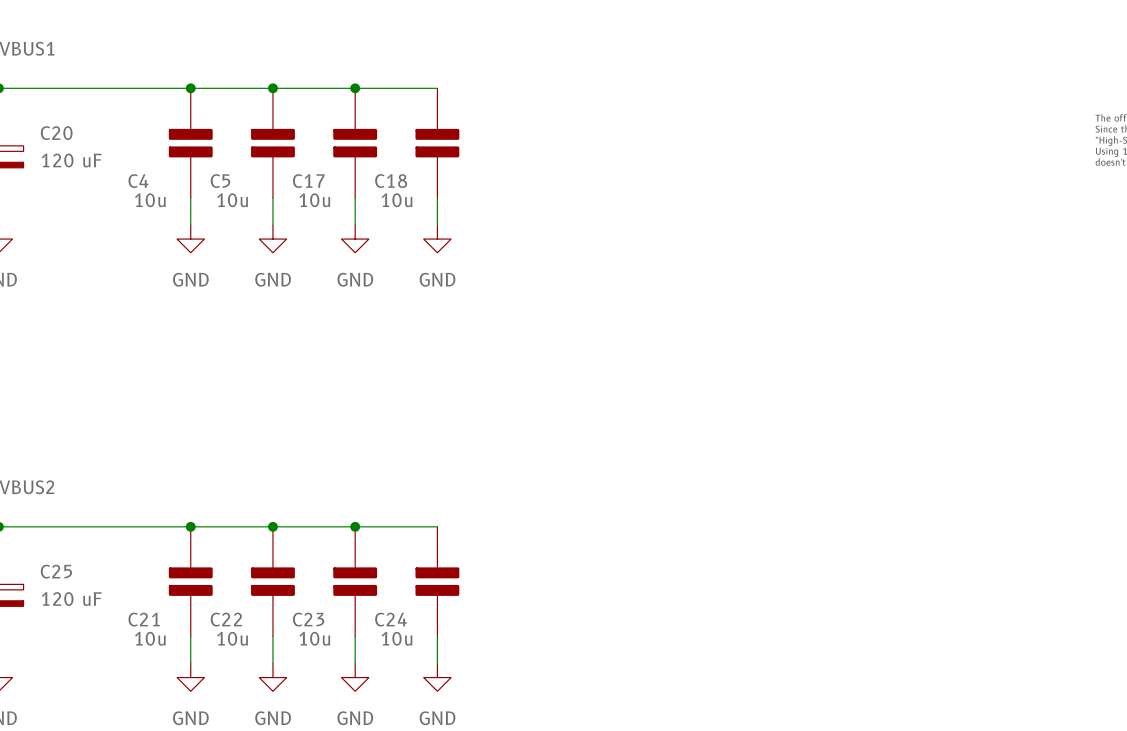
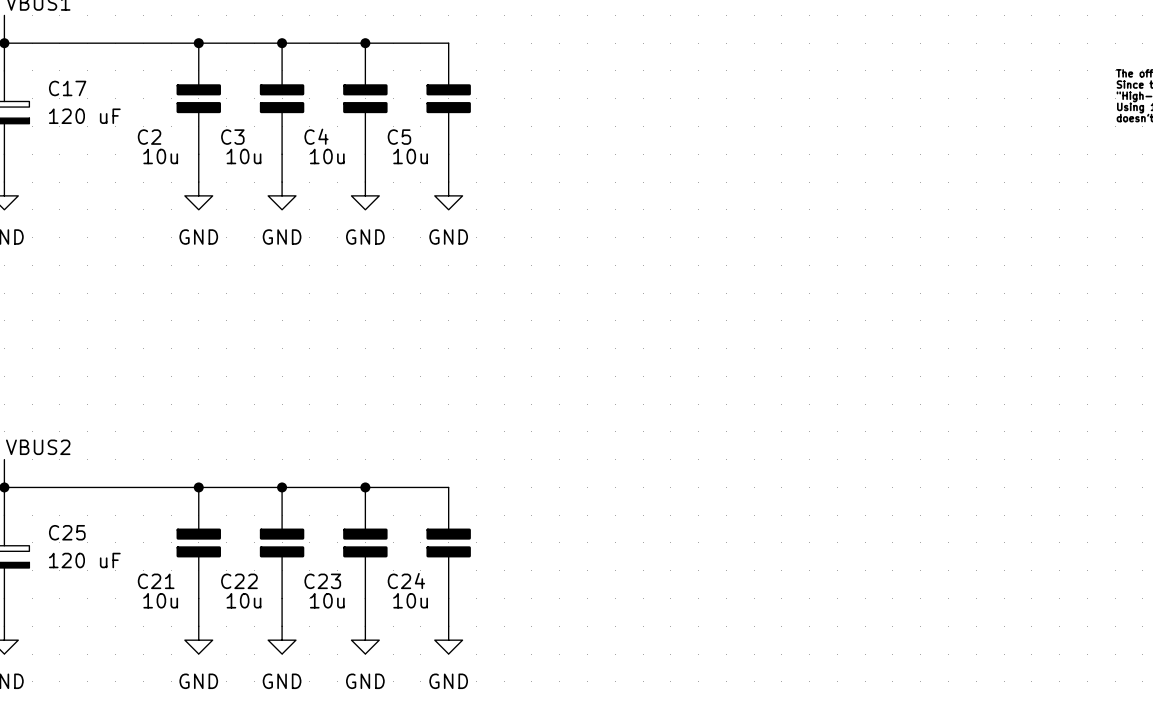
C20 name: C20 (56, 133) -> C17 (67, 88)
C4 name: C4 (138, 181) -> C2 (149, 137)
C5 name: C5 (220, 181) -> C3 (232, 137)
C17 name: C17 (308, 181) -> C4 (316, 136)
C18 name: C18 (391, 181) -> C5 (399, 137)

